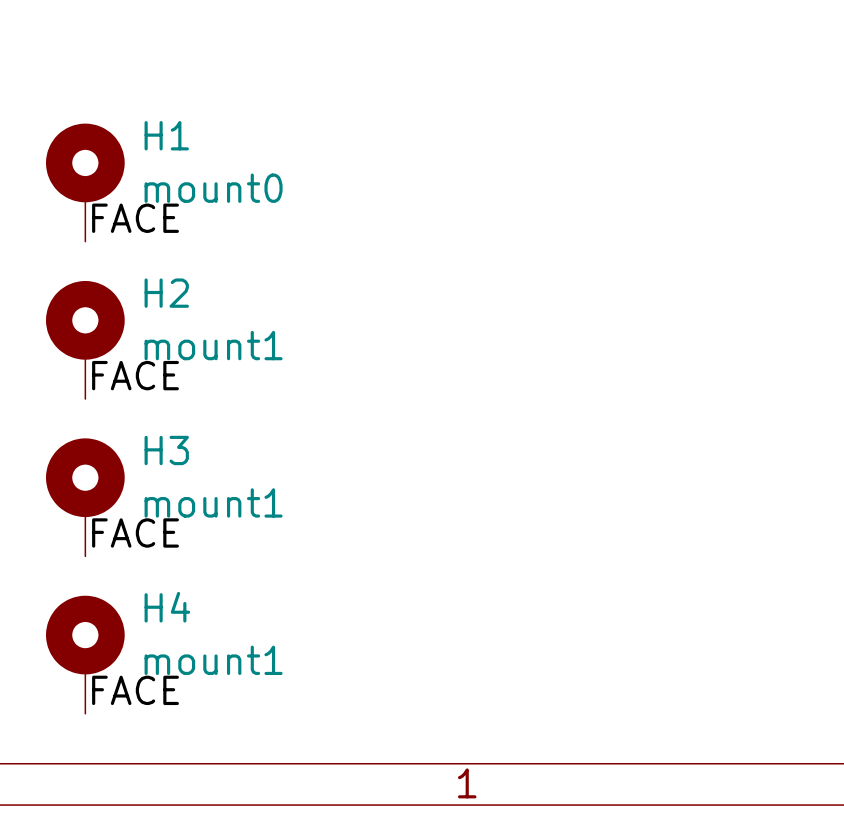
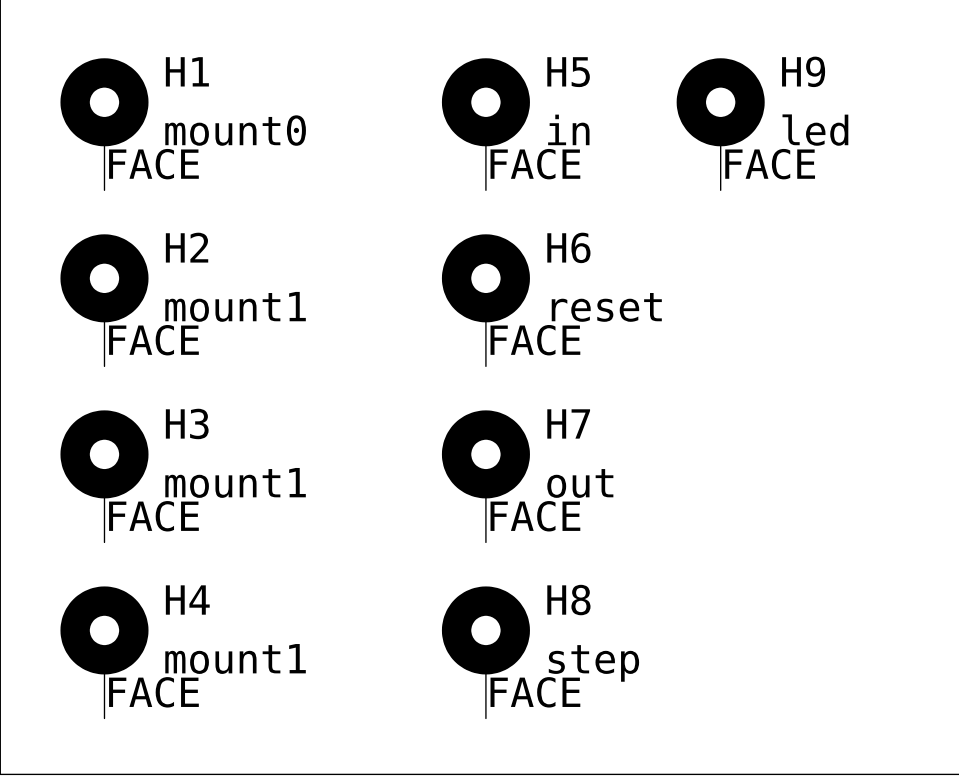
H5: none -> in (485, 124)
H9: none -> led (720, 124)
label: none -> FACE (535, 164)
label: none -> FACE (770, 164)
H6: none -> reset (485, 300)
label: none -> FACE (535, 340)
H7: none -> out (485, 476)
label: none -> FACE (535, 516)
H8: none -> step (485, 652)
label: none -> FACE (535, 692)

